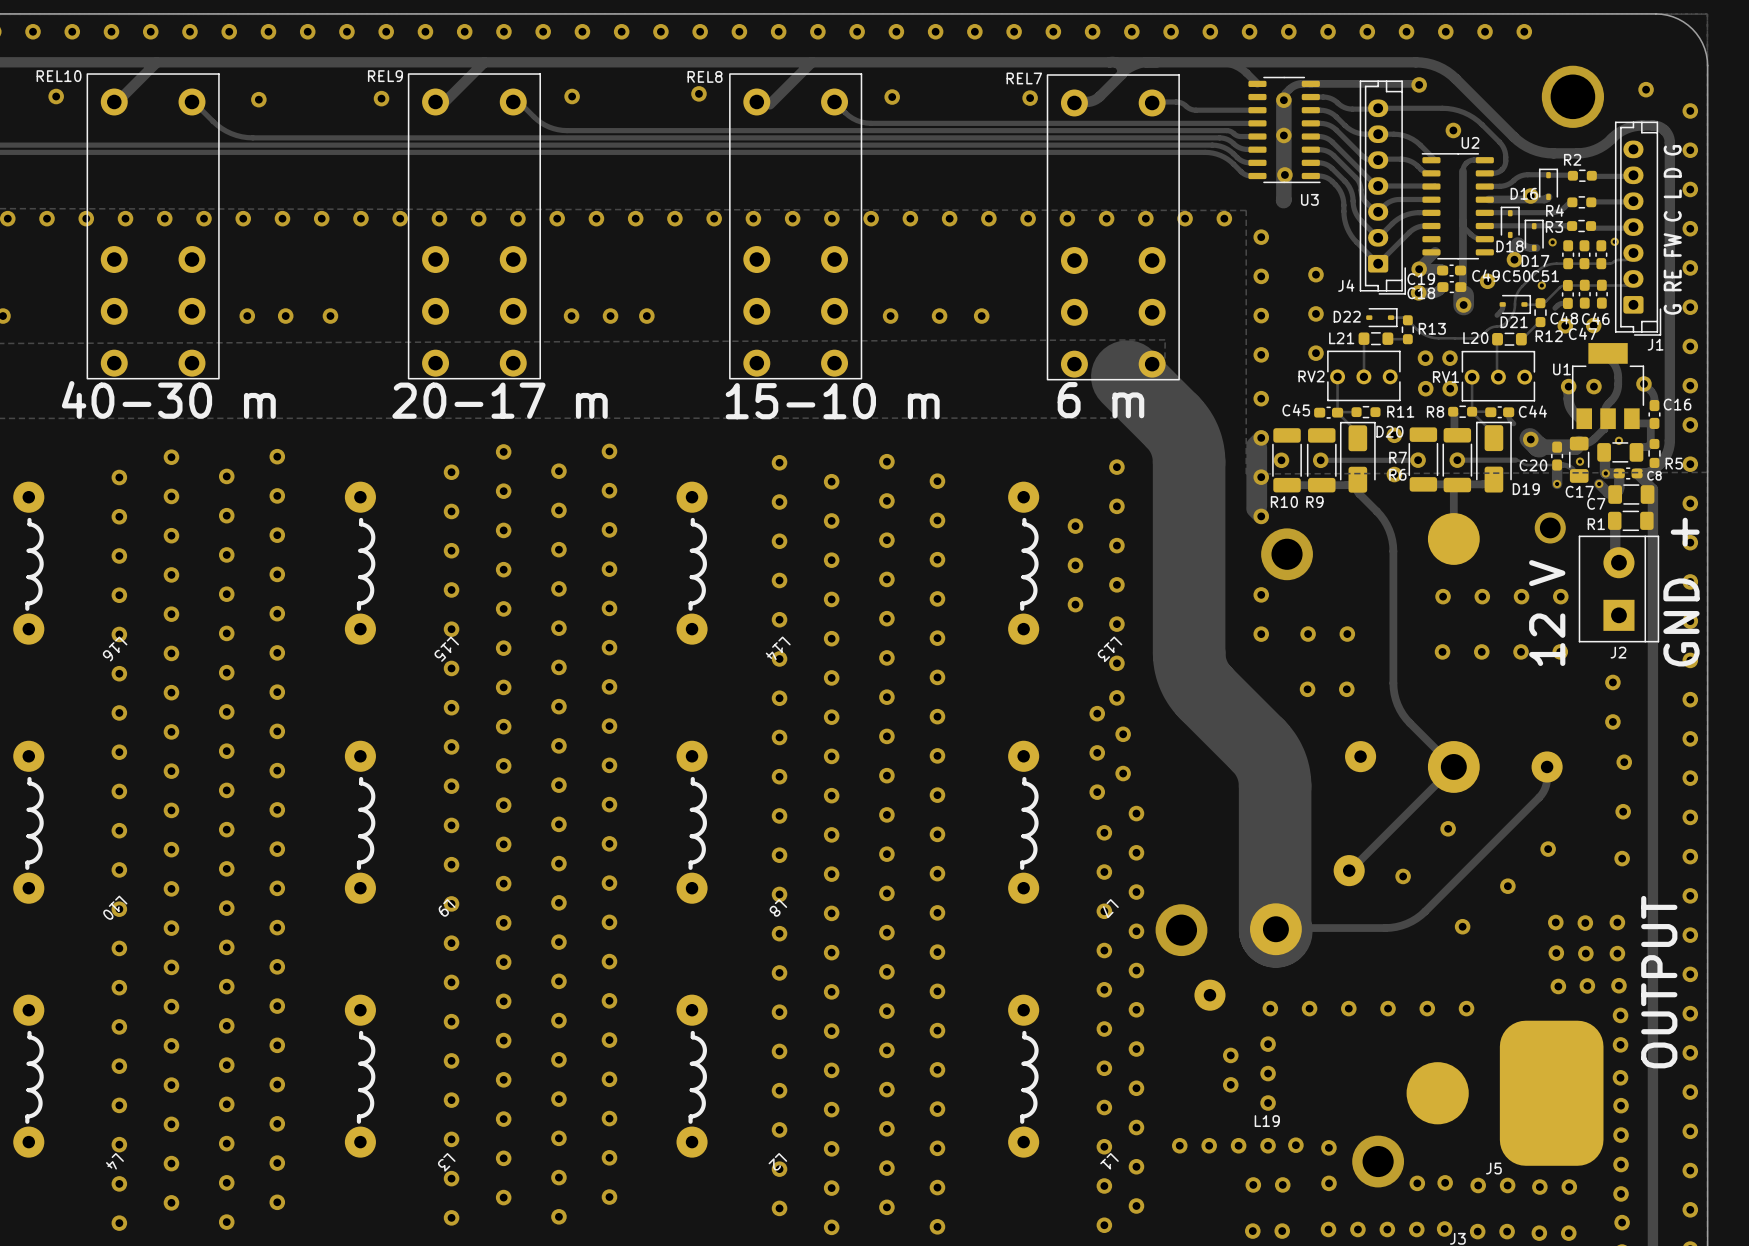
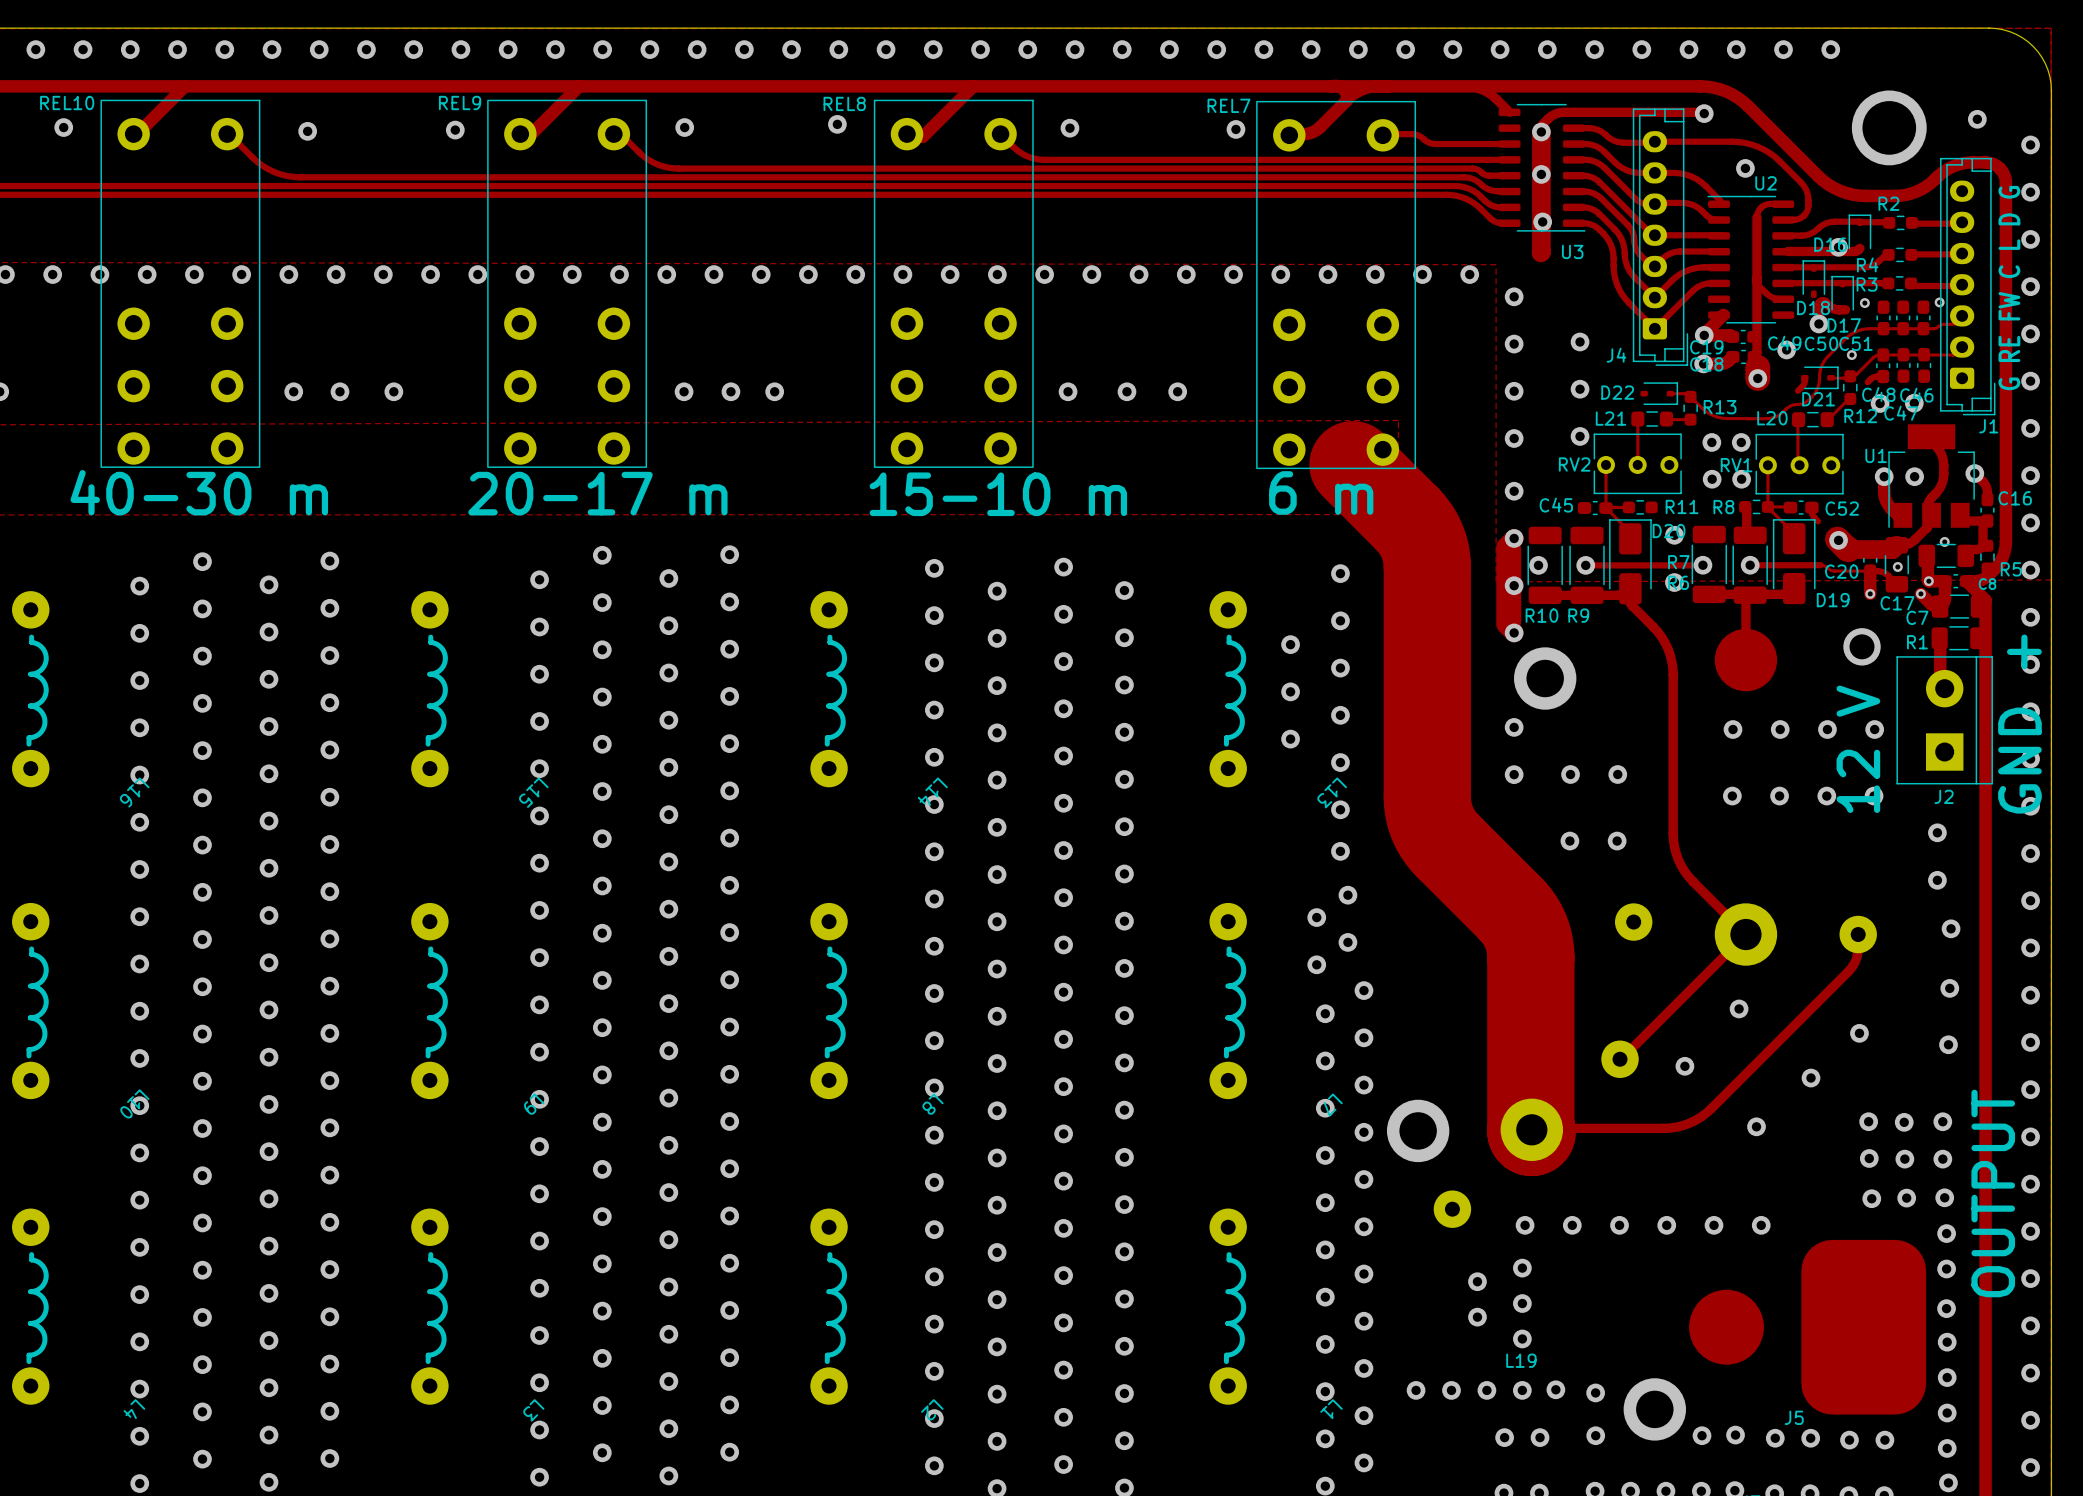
C44 name: C44 (1532, 411) -> C52 (1842, 508)
via: (1097, 713) -> none

